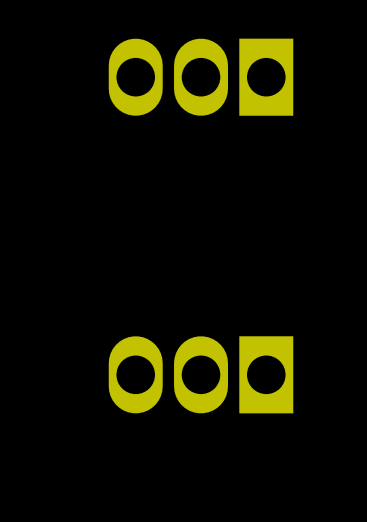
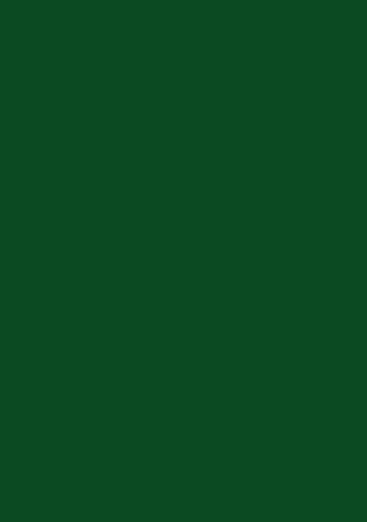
part: (201, 77) -> none
part: (201, 374) -> none

